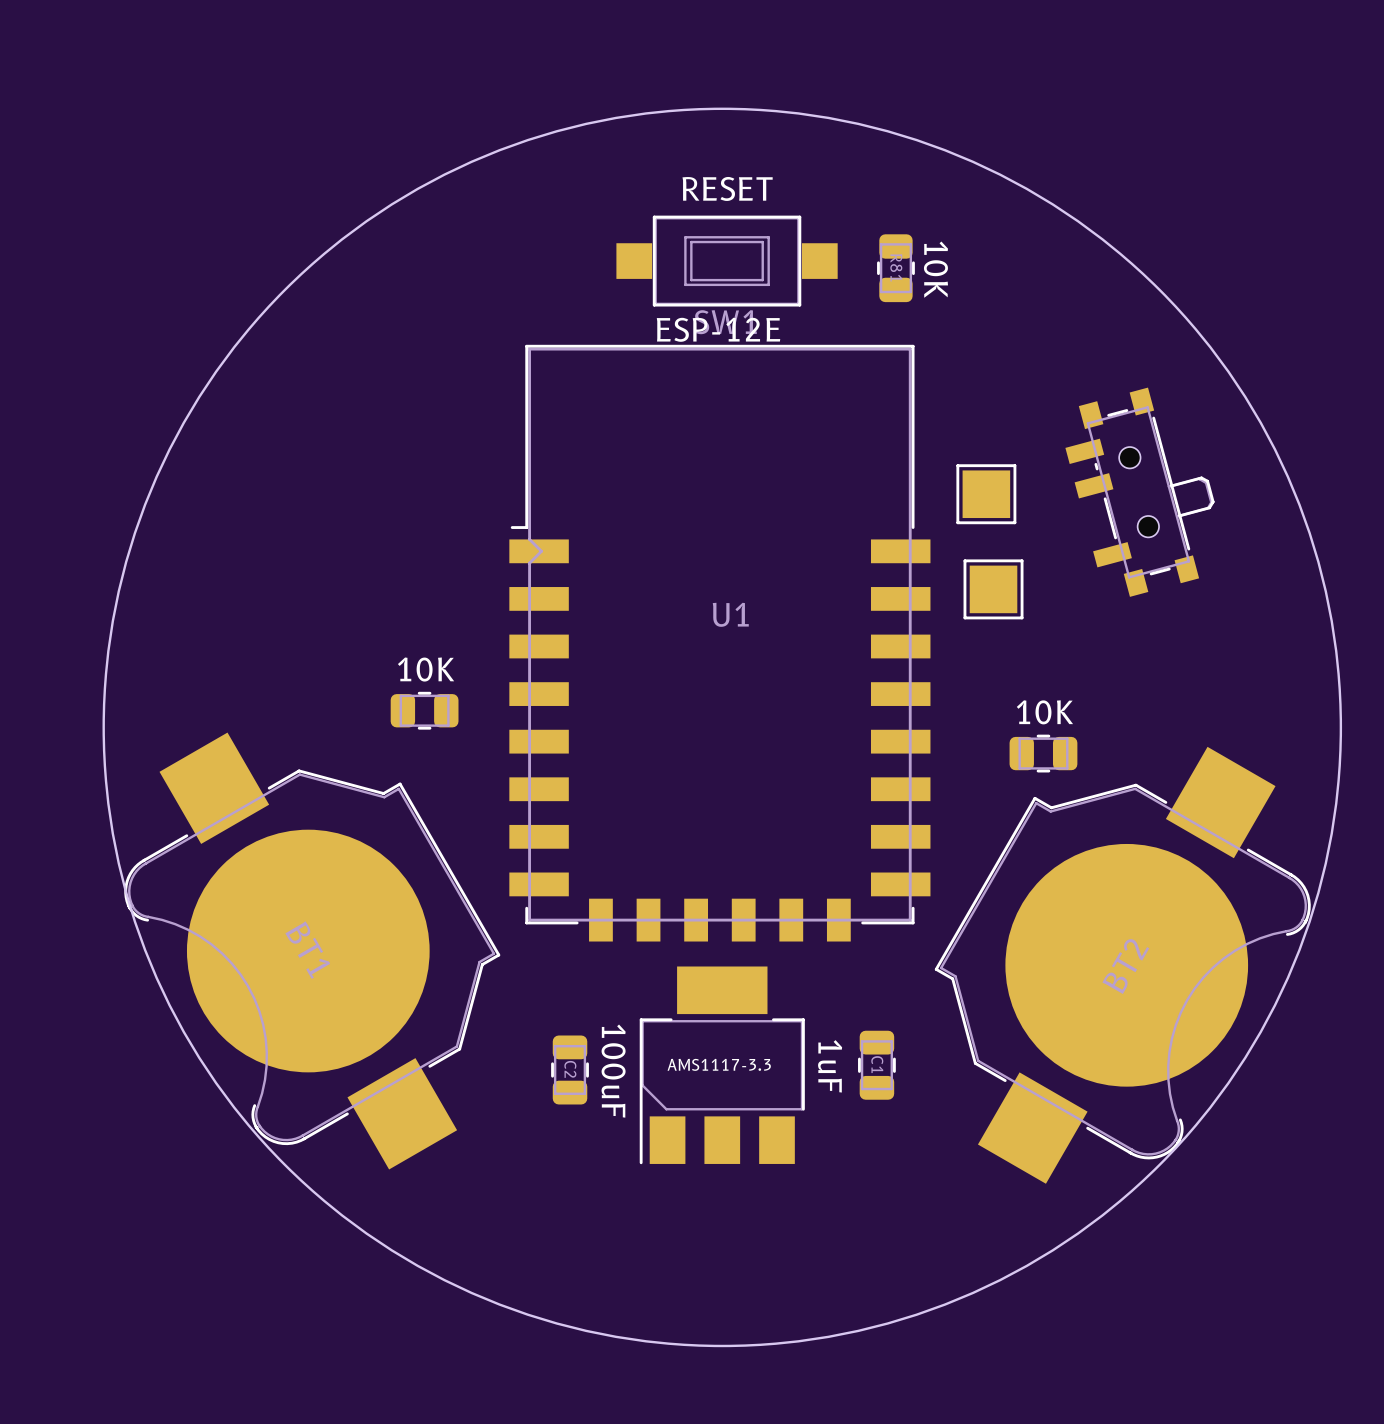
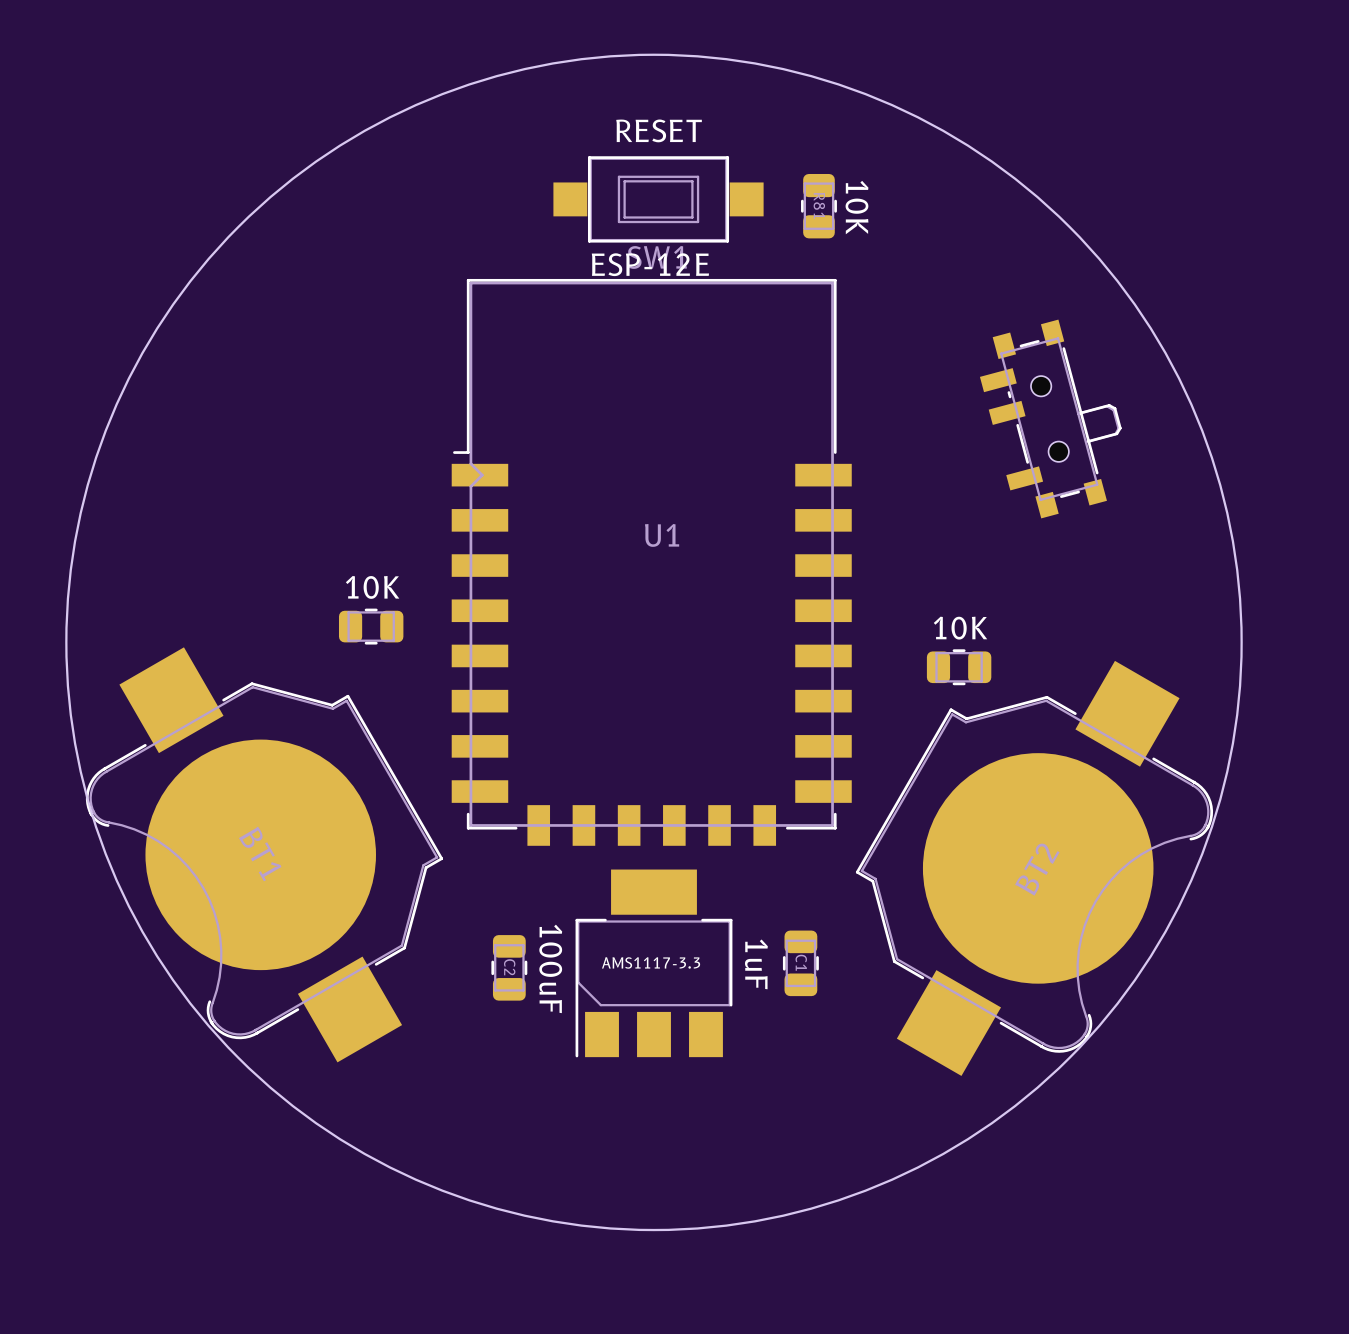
part: (986, 494) -> none
part: (993, 589) -> none

